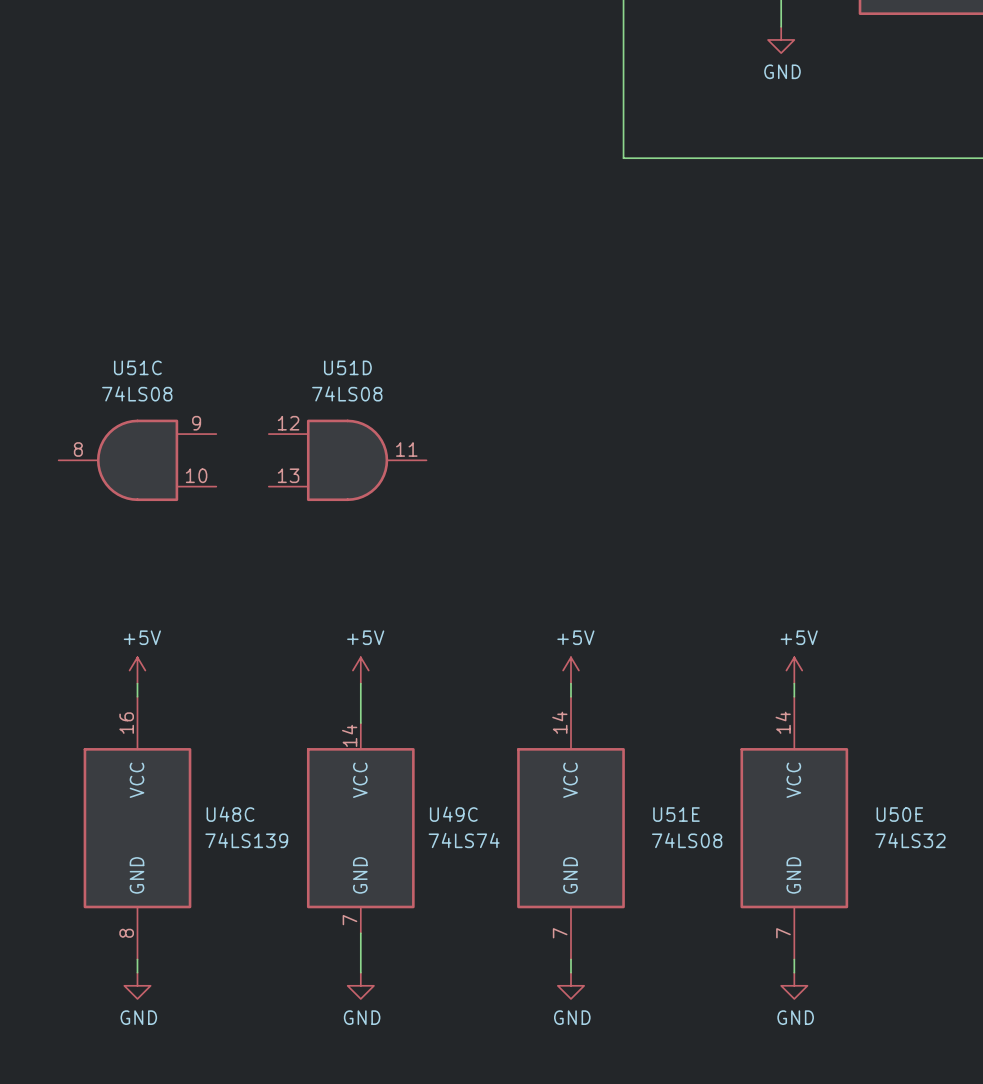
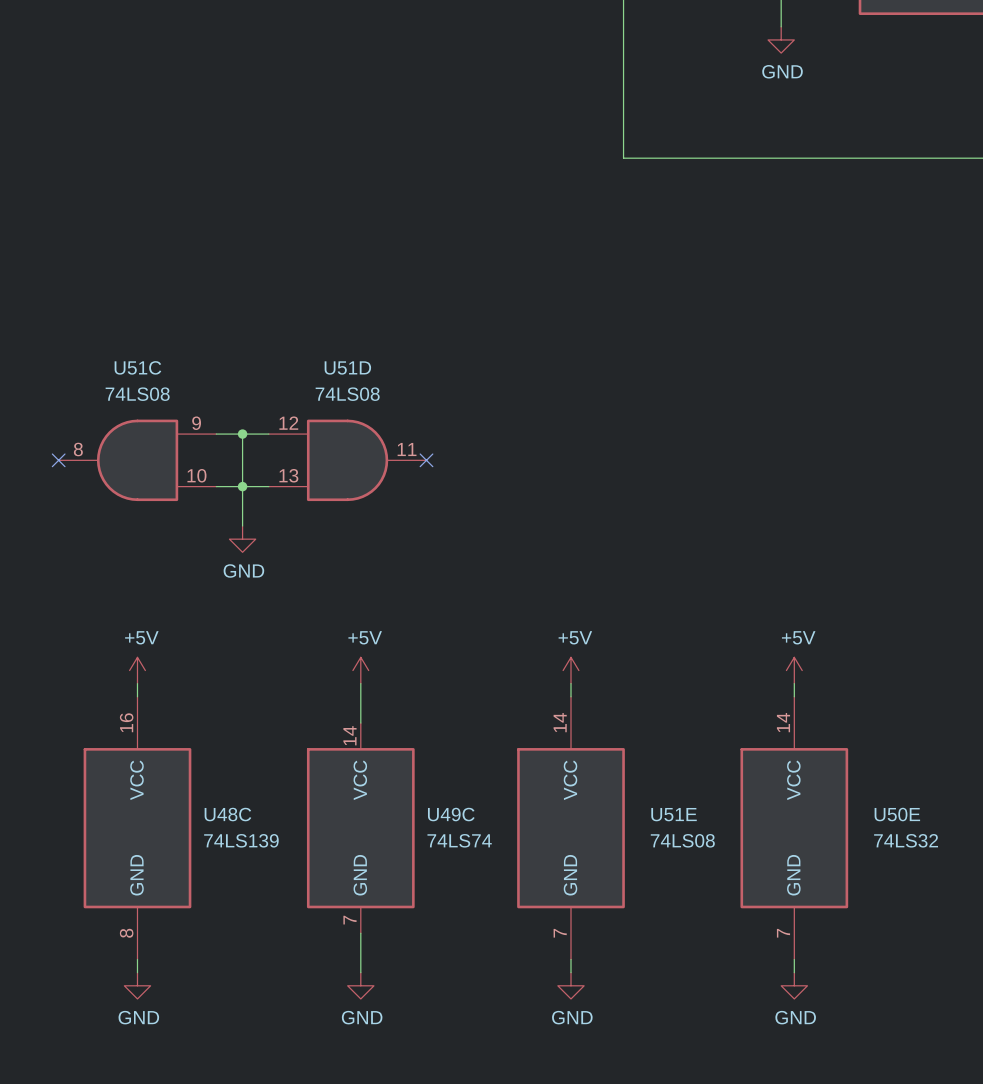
wire: none -> (216, 434) (268, 434)
wire: none -> (242, 434) (242, 526)
junction: none -> (242, 434)
no-connect mark: none -> (58, 460)
no-connect mark: none -> (426, 460)
wire: none -> (216, 486) (268, 486)
junction: none -> (242, 486)
power symbol: none -> GND (242, 539)

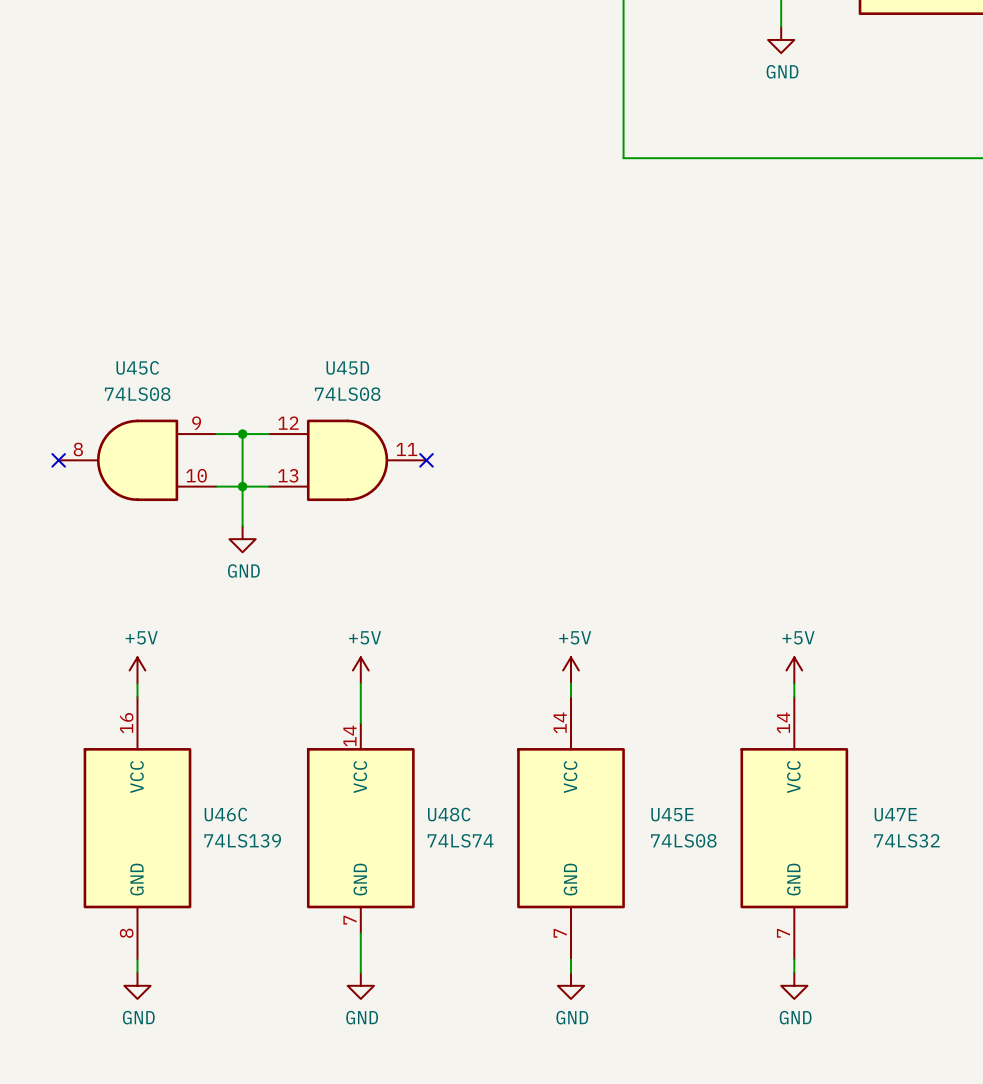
U51C name: U51C (137, 367) -> U45C (137, 367)
U51D name: U51D (347, 367) -> U45D (347, 368)
U48C name: U48C (227, 814) -> U46C (225, 814)
U49C name: U49C (451, 814) -> U48C (449, 814)
U51E name: U51E (674, 814) -> U45E (672, 814)
U50E name: U50E (897, 814) -> U47E (895, 814)

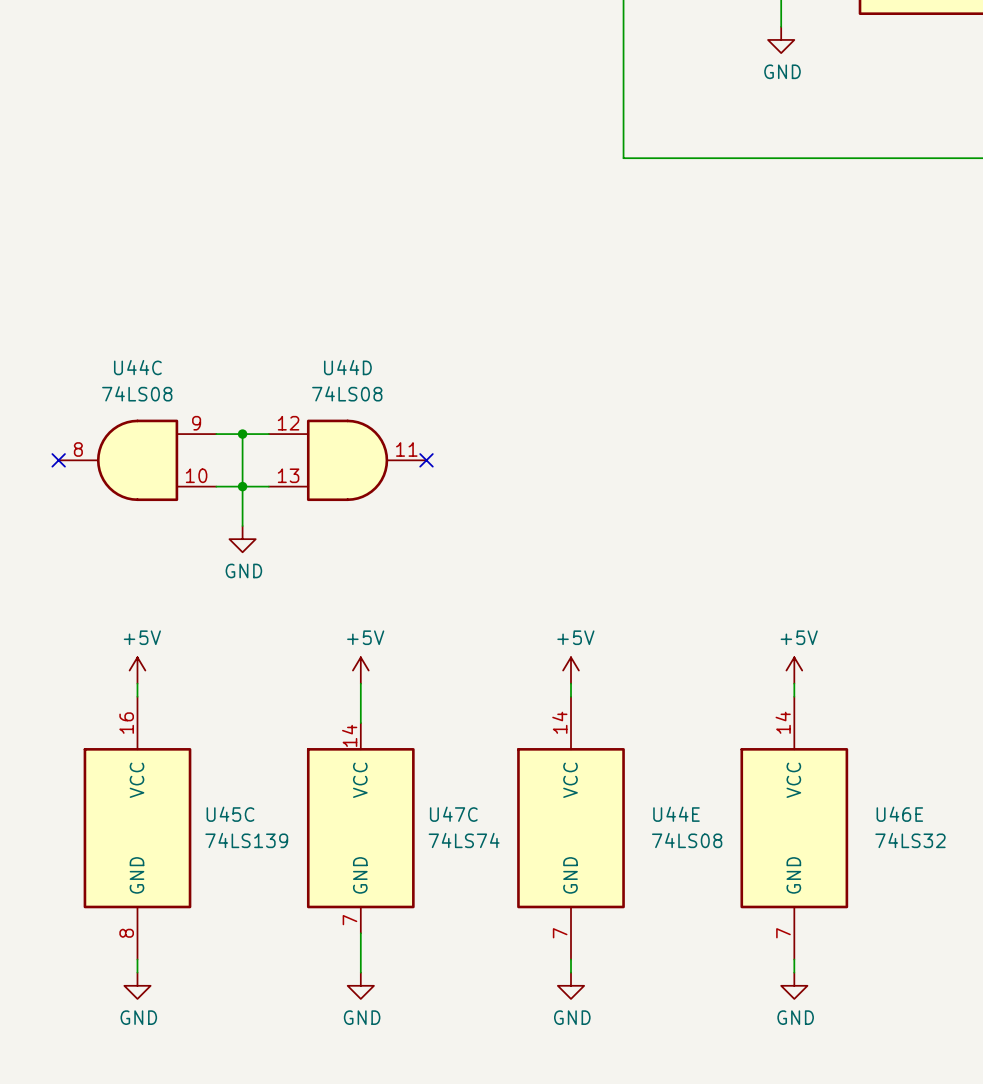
U45C name: U45C (137, 367) -> U44C (137, 367)
U45D name: U45D (347, 368) -> U44D (347, 367)
U46C name: U46C (225, 814) -> U45C (230, 814)
U48C name: U48C (449, 814) -> U47C (453, 814)
U45E name: U45E (672, 814) -> U44E (676, 814)
U47E name: U47E (895, 814) -> U46E (899, 814)

